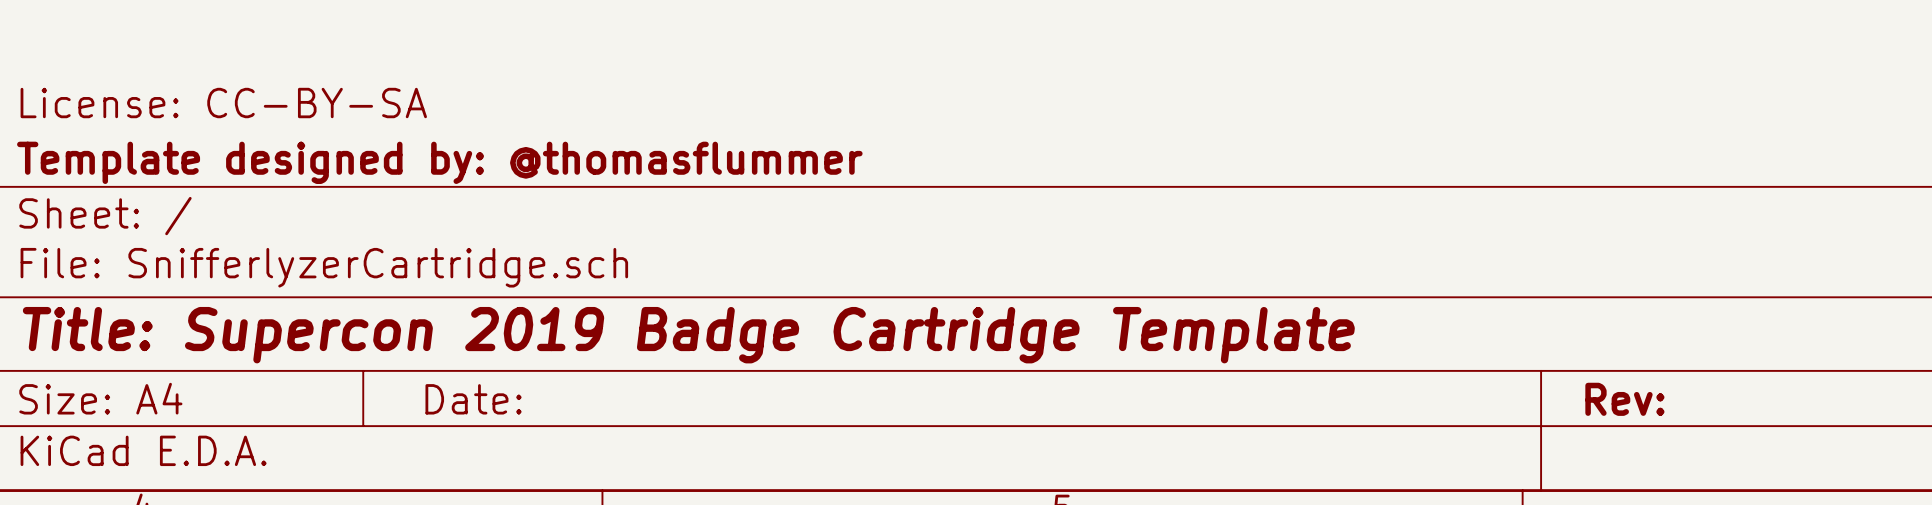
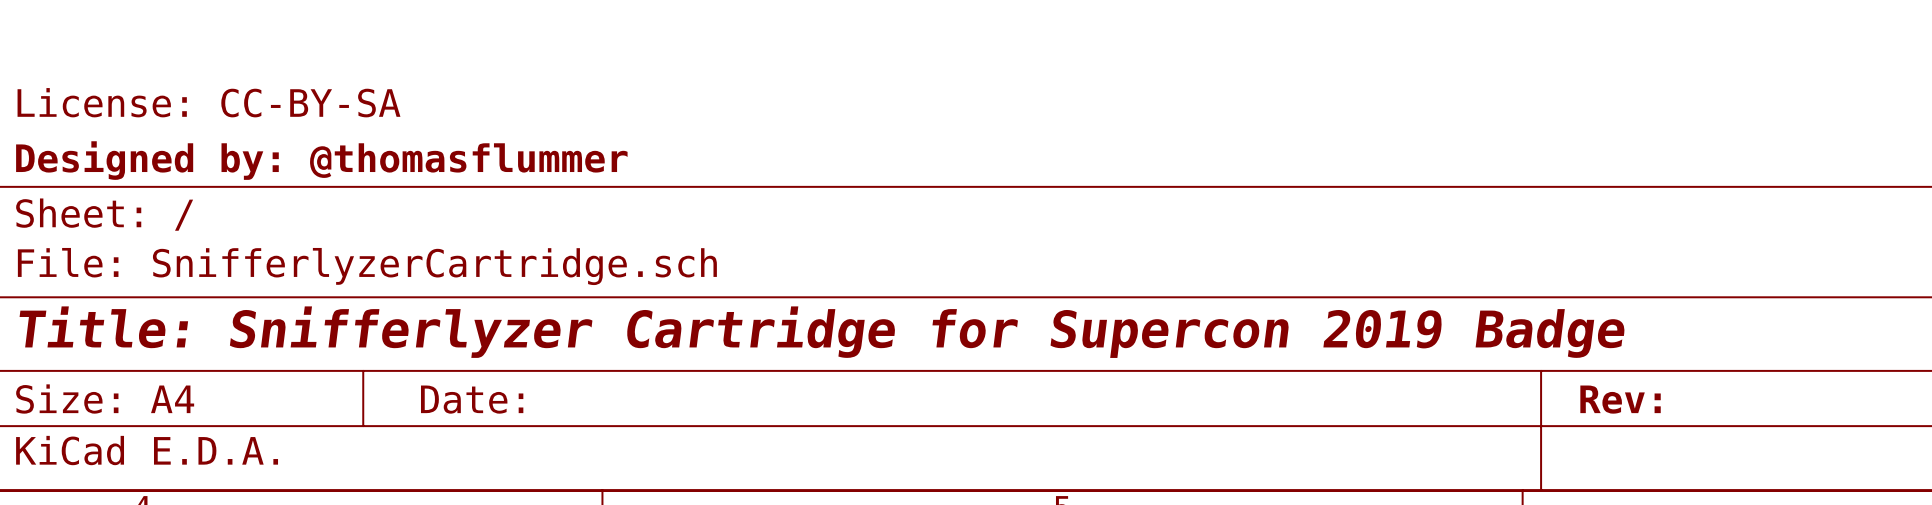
title block: Template designed by: @thomasflummer (439, 162) -> Designed by: @thomasflummer (321, 160)
title block: Title: Supercon 2019 Badge Cartridge Template (688, 335) -> Title: Snifferlyzer Cartridge for Supercon 2019 Badge (822, 332)

